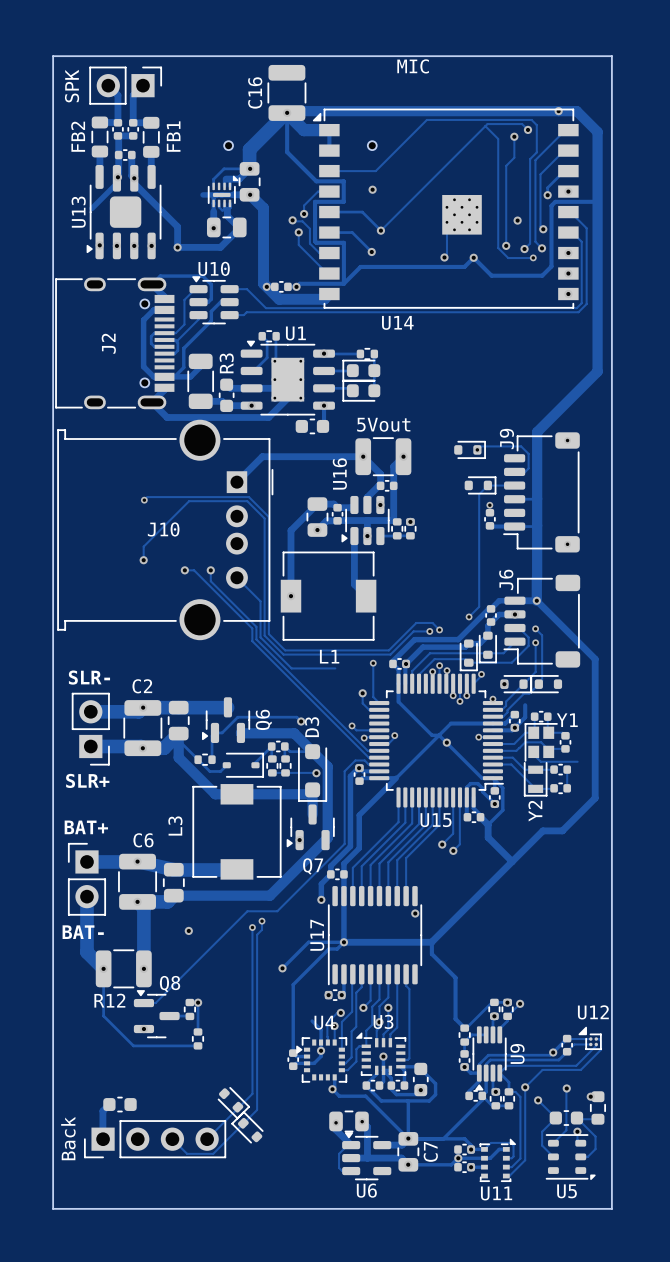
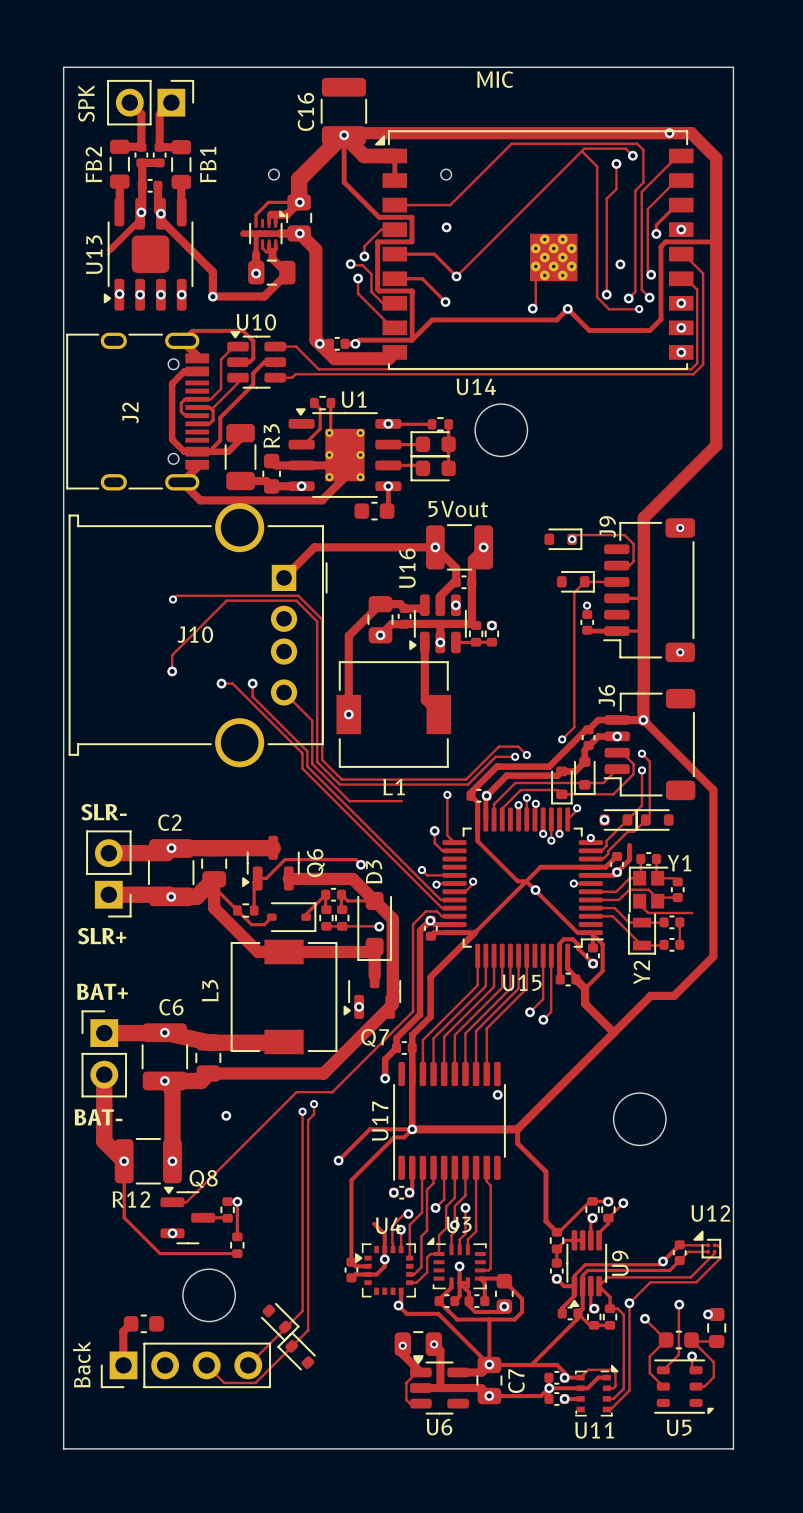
round board edge: none -> [474, 403, 528, 457]
round board edge: none -> [613, 1092, 667, 1146]
round board edge: none -> [182, 1268, 236, 1322]

